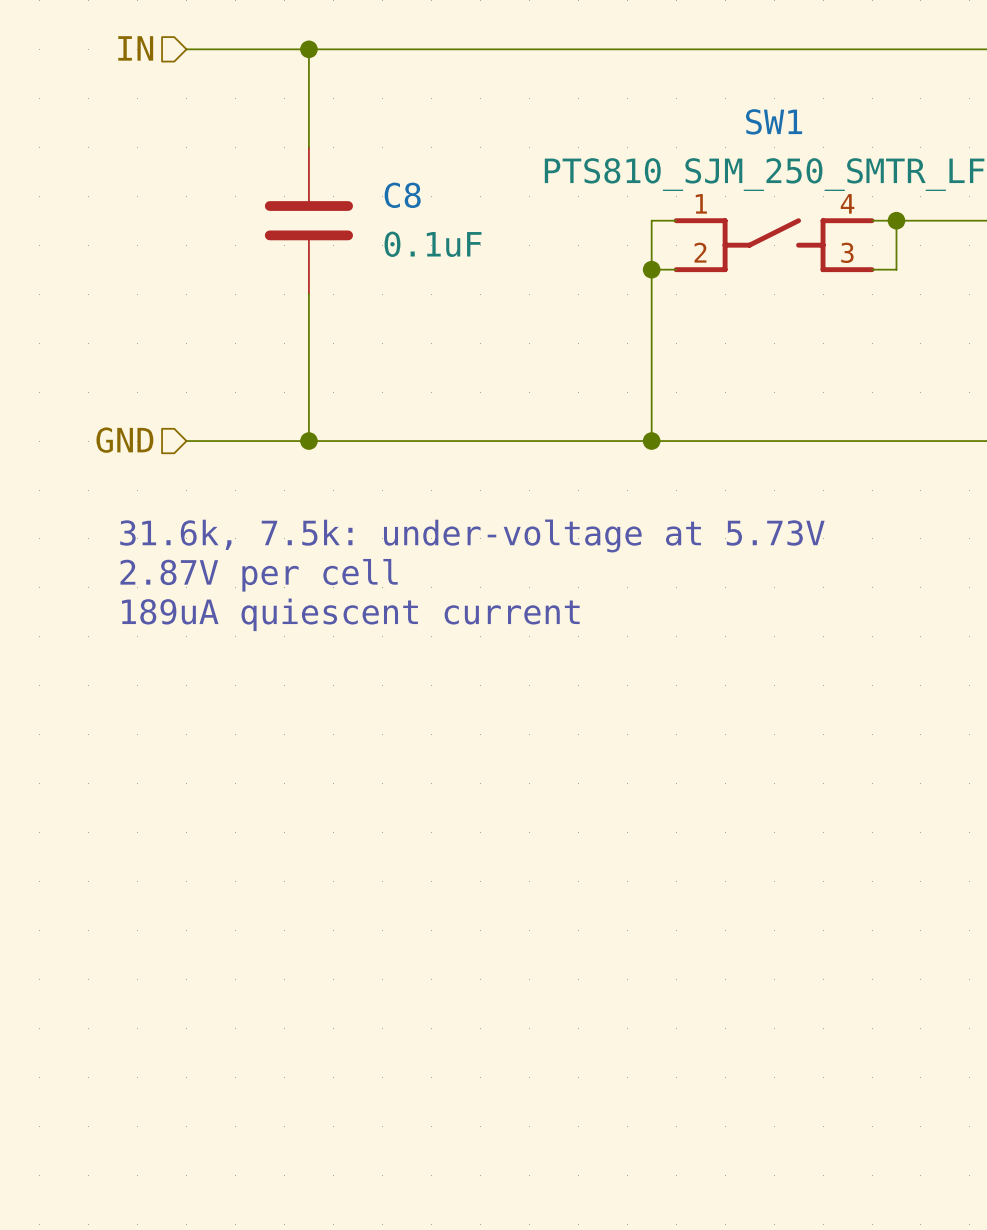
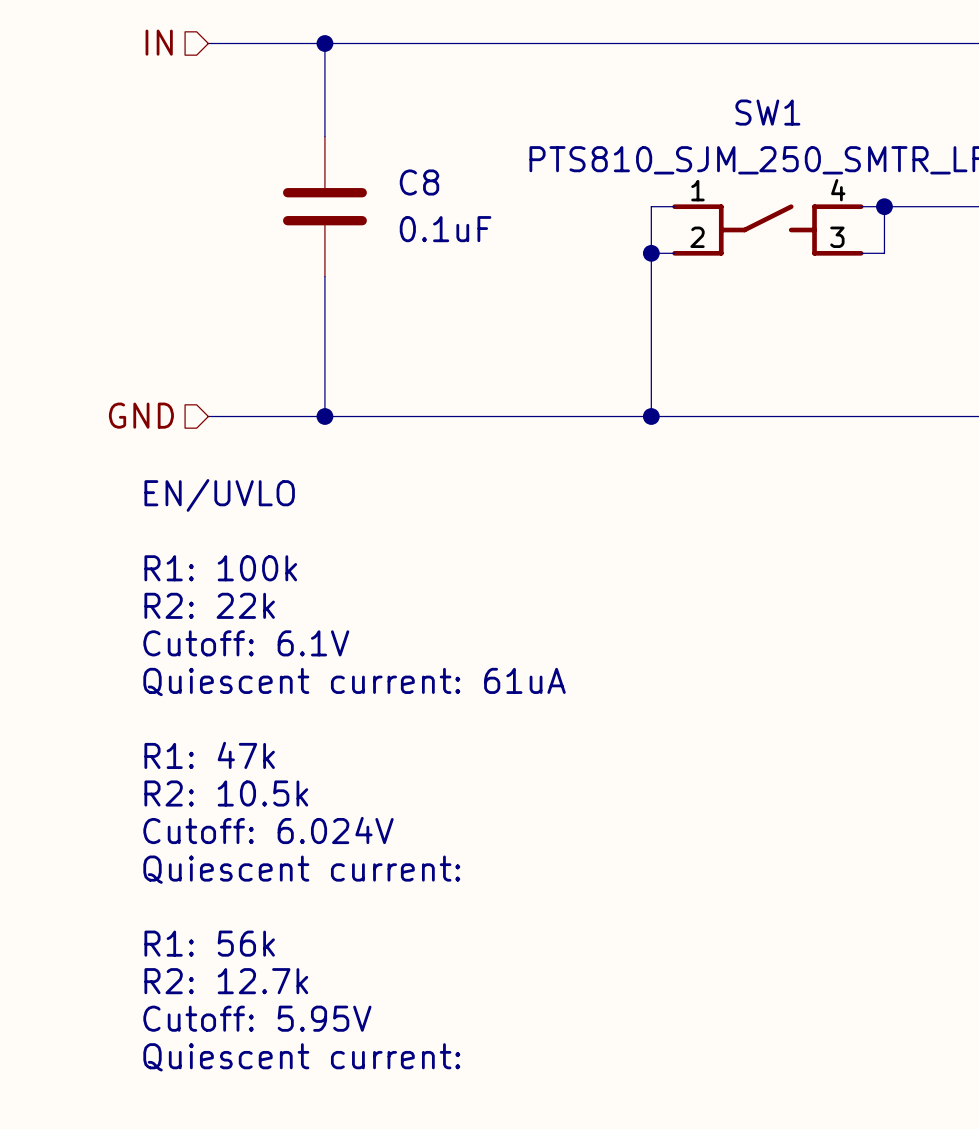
text: 31.6k, 7.5k: under-voltage at 5.73V (472, 535) -> EN/UVLO (219, 495)
text: 2.87V per cell (259, 575) -> none
text: 189uA quiescent current (350, 614) -> R1: 100k (220, 568)
text: none -> R2: 22k (209, 605)
text: none -> Cutoff: 6.1V (246, 643)
text: none -> Quiescent current: 61uA (354, 682)
text: none -> R1: 47k (209, 755)
text: none -> R2: 10.5k (226, 793)
text: none -> Cutoff: 6.024V (268, 830)
text: none -> Quiescent current: (301, 869)
text: none -> R1: 56k (209, 943)
text: none -> R2: 12.7k (226, 981)
text: none -> Cutoff: 5.95V (257, 1018)
text: none -> Quiescent current: (301, 1057)

